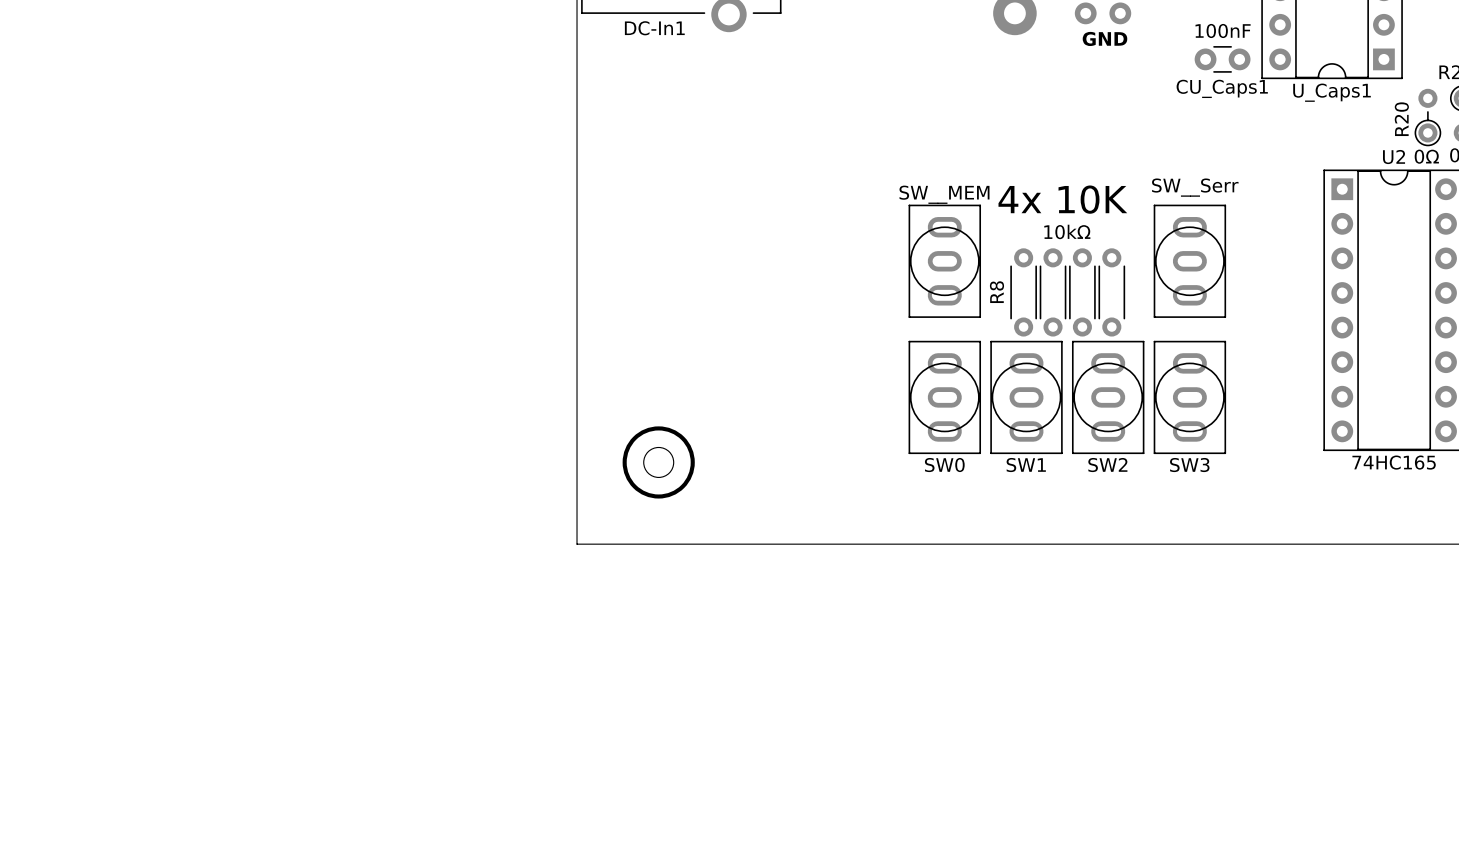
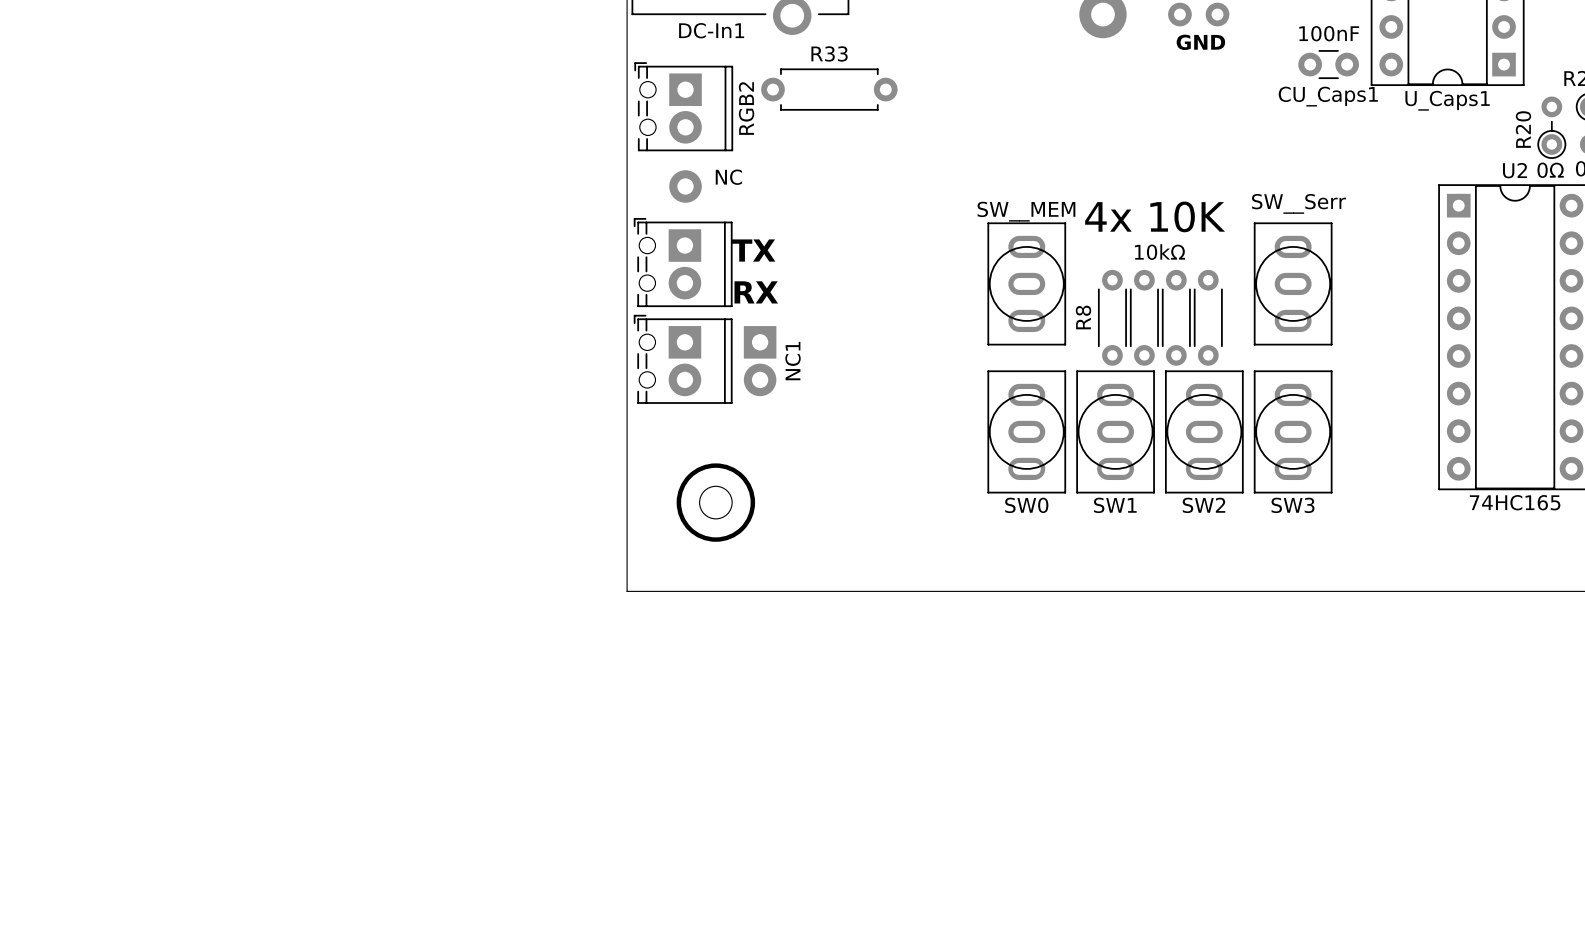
R33: none -> (829, 89)
RGB2: none -> (683, 106)
text: none -> NC (728, 177)
part: none -> (685, 186)
text: none -> TX (753, 250)
part: none -> (683, 262)
text: none -> RX (756, 292)
part: none -> (760, 342)
NC1: none -> (683, 359)
part: none -> (760, 379)

